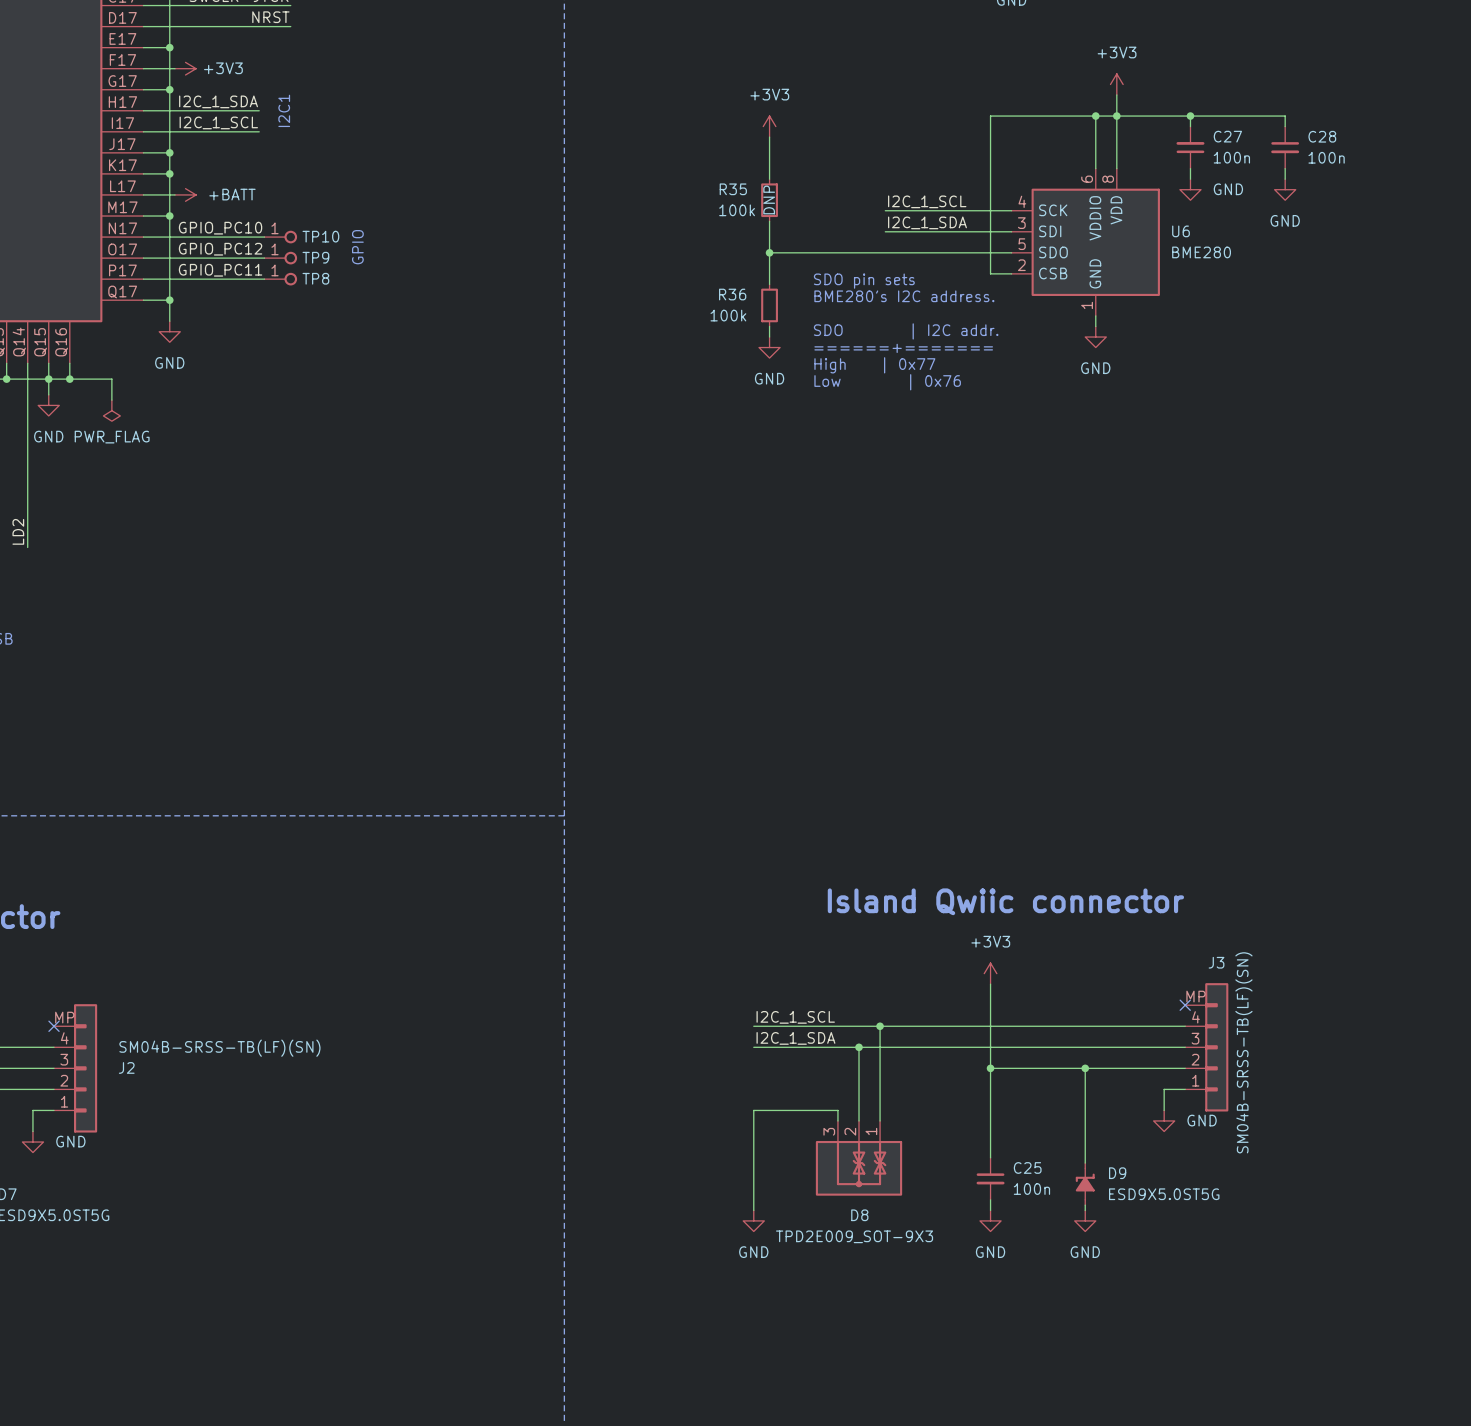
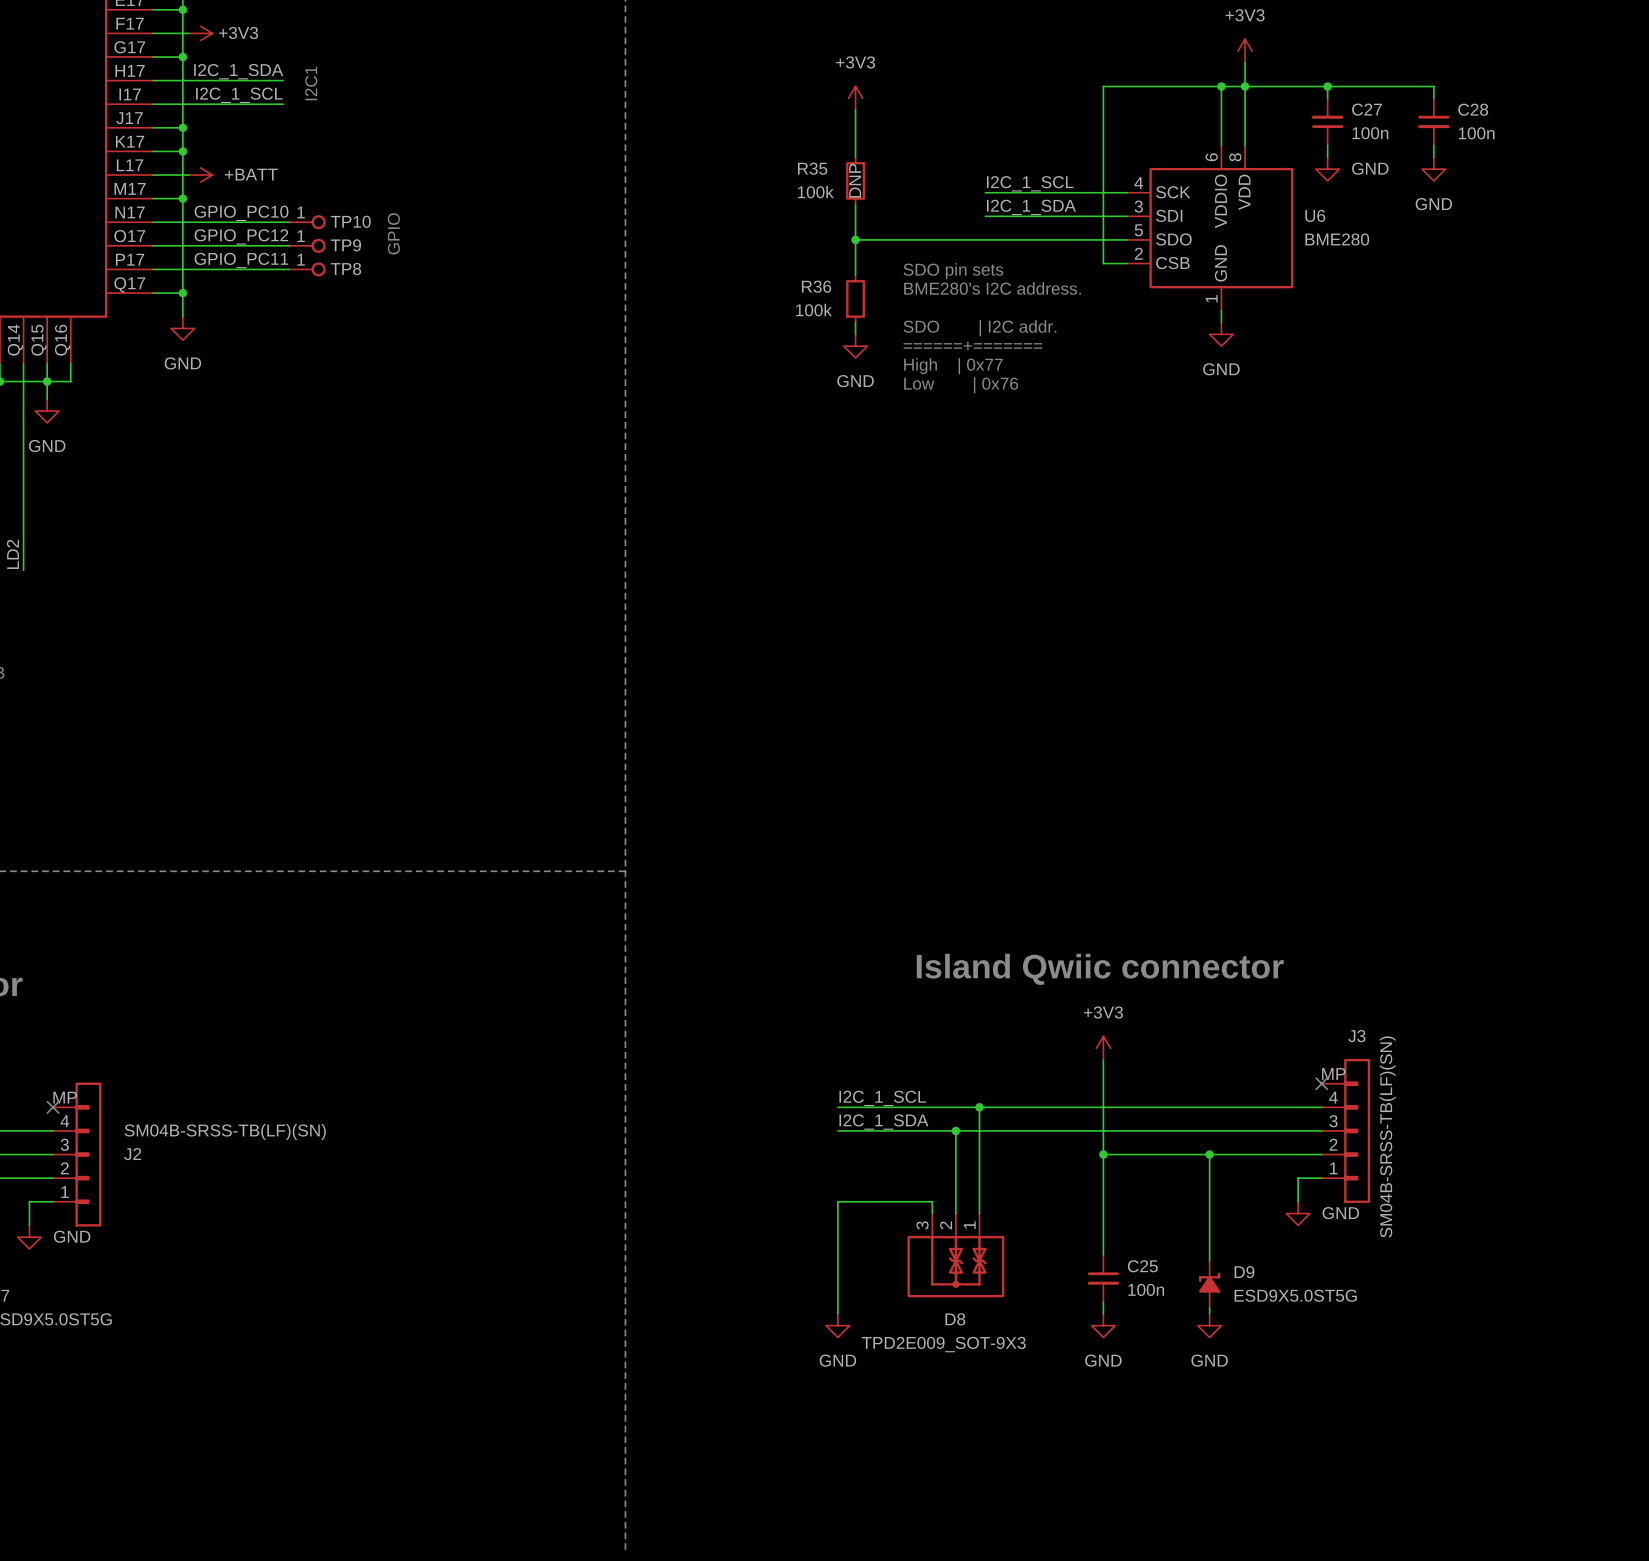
wire: (69, 379) (111, 379) (111, 400) -> none
junction: (69, 379) -> none
power symbol: PWR_FLAG (111, 410) -> none

